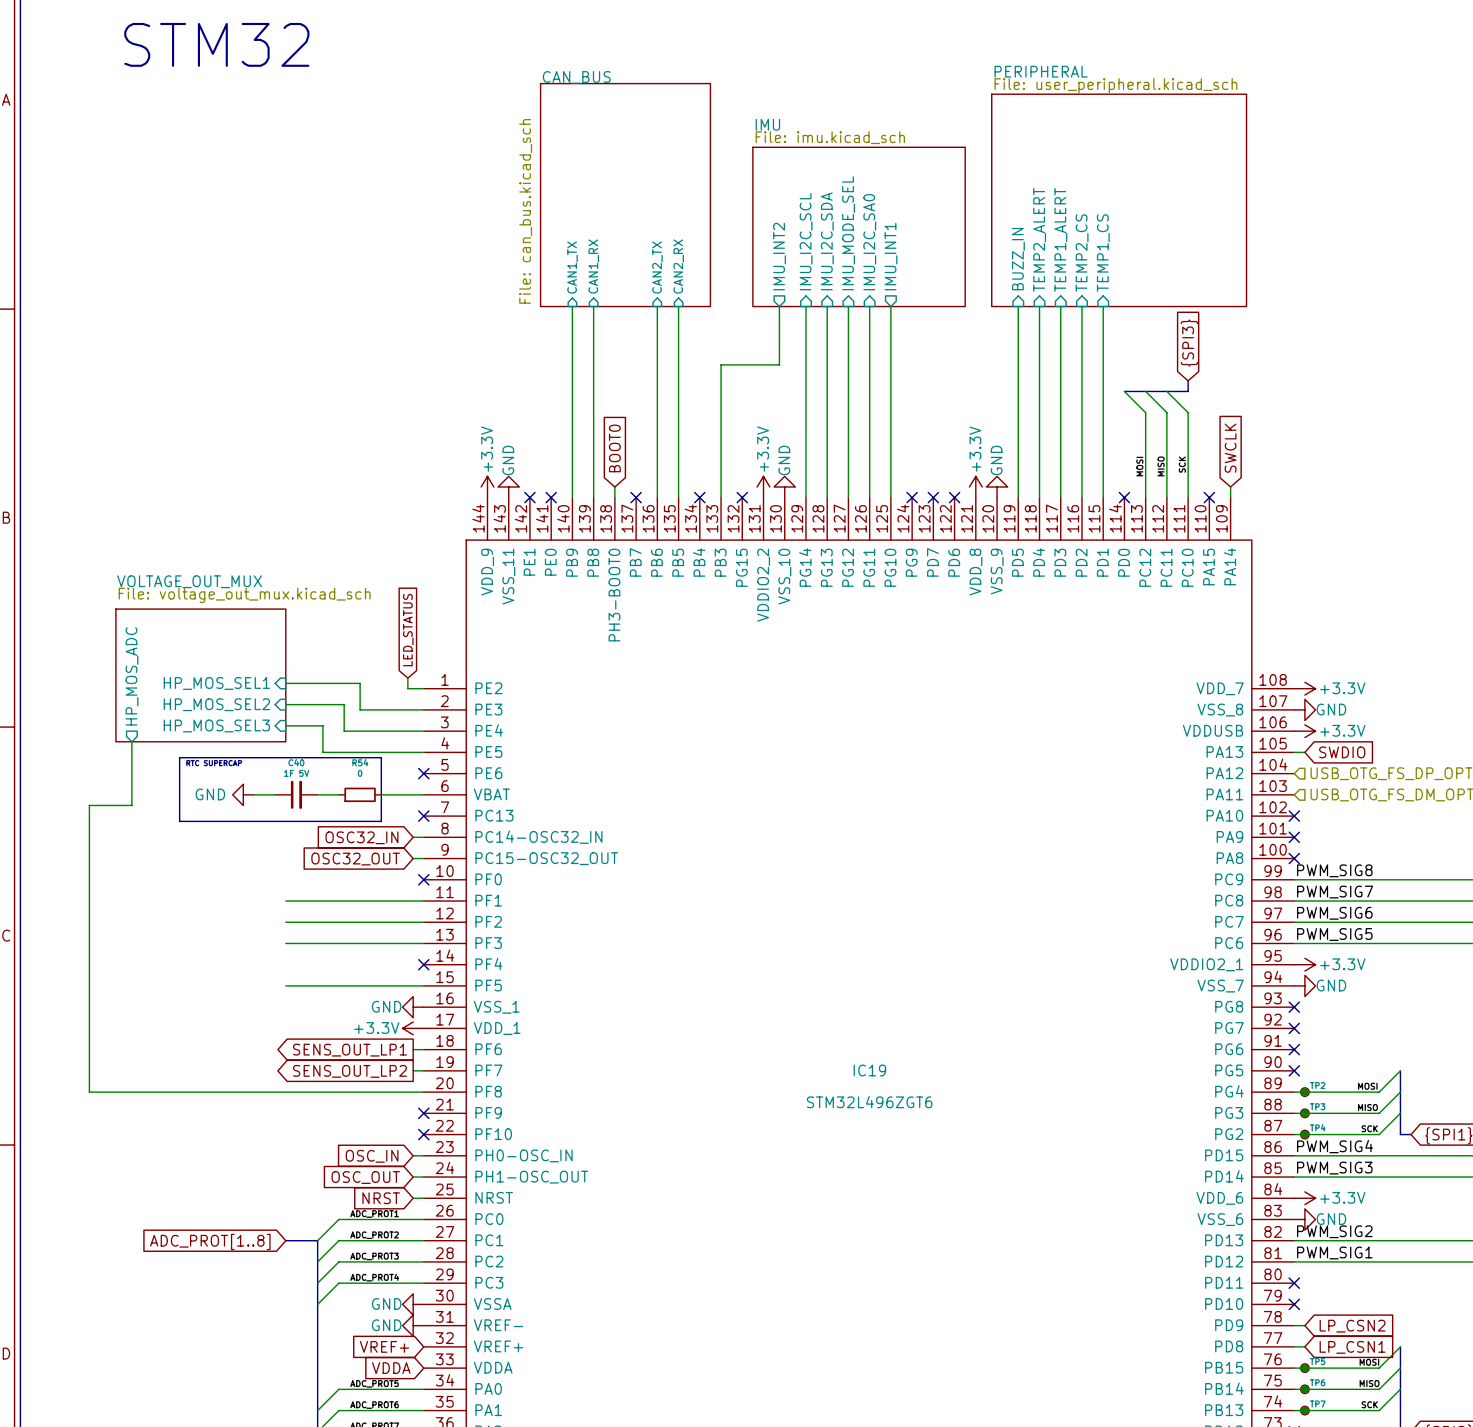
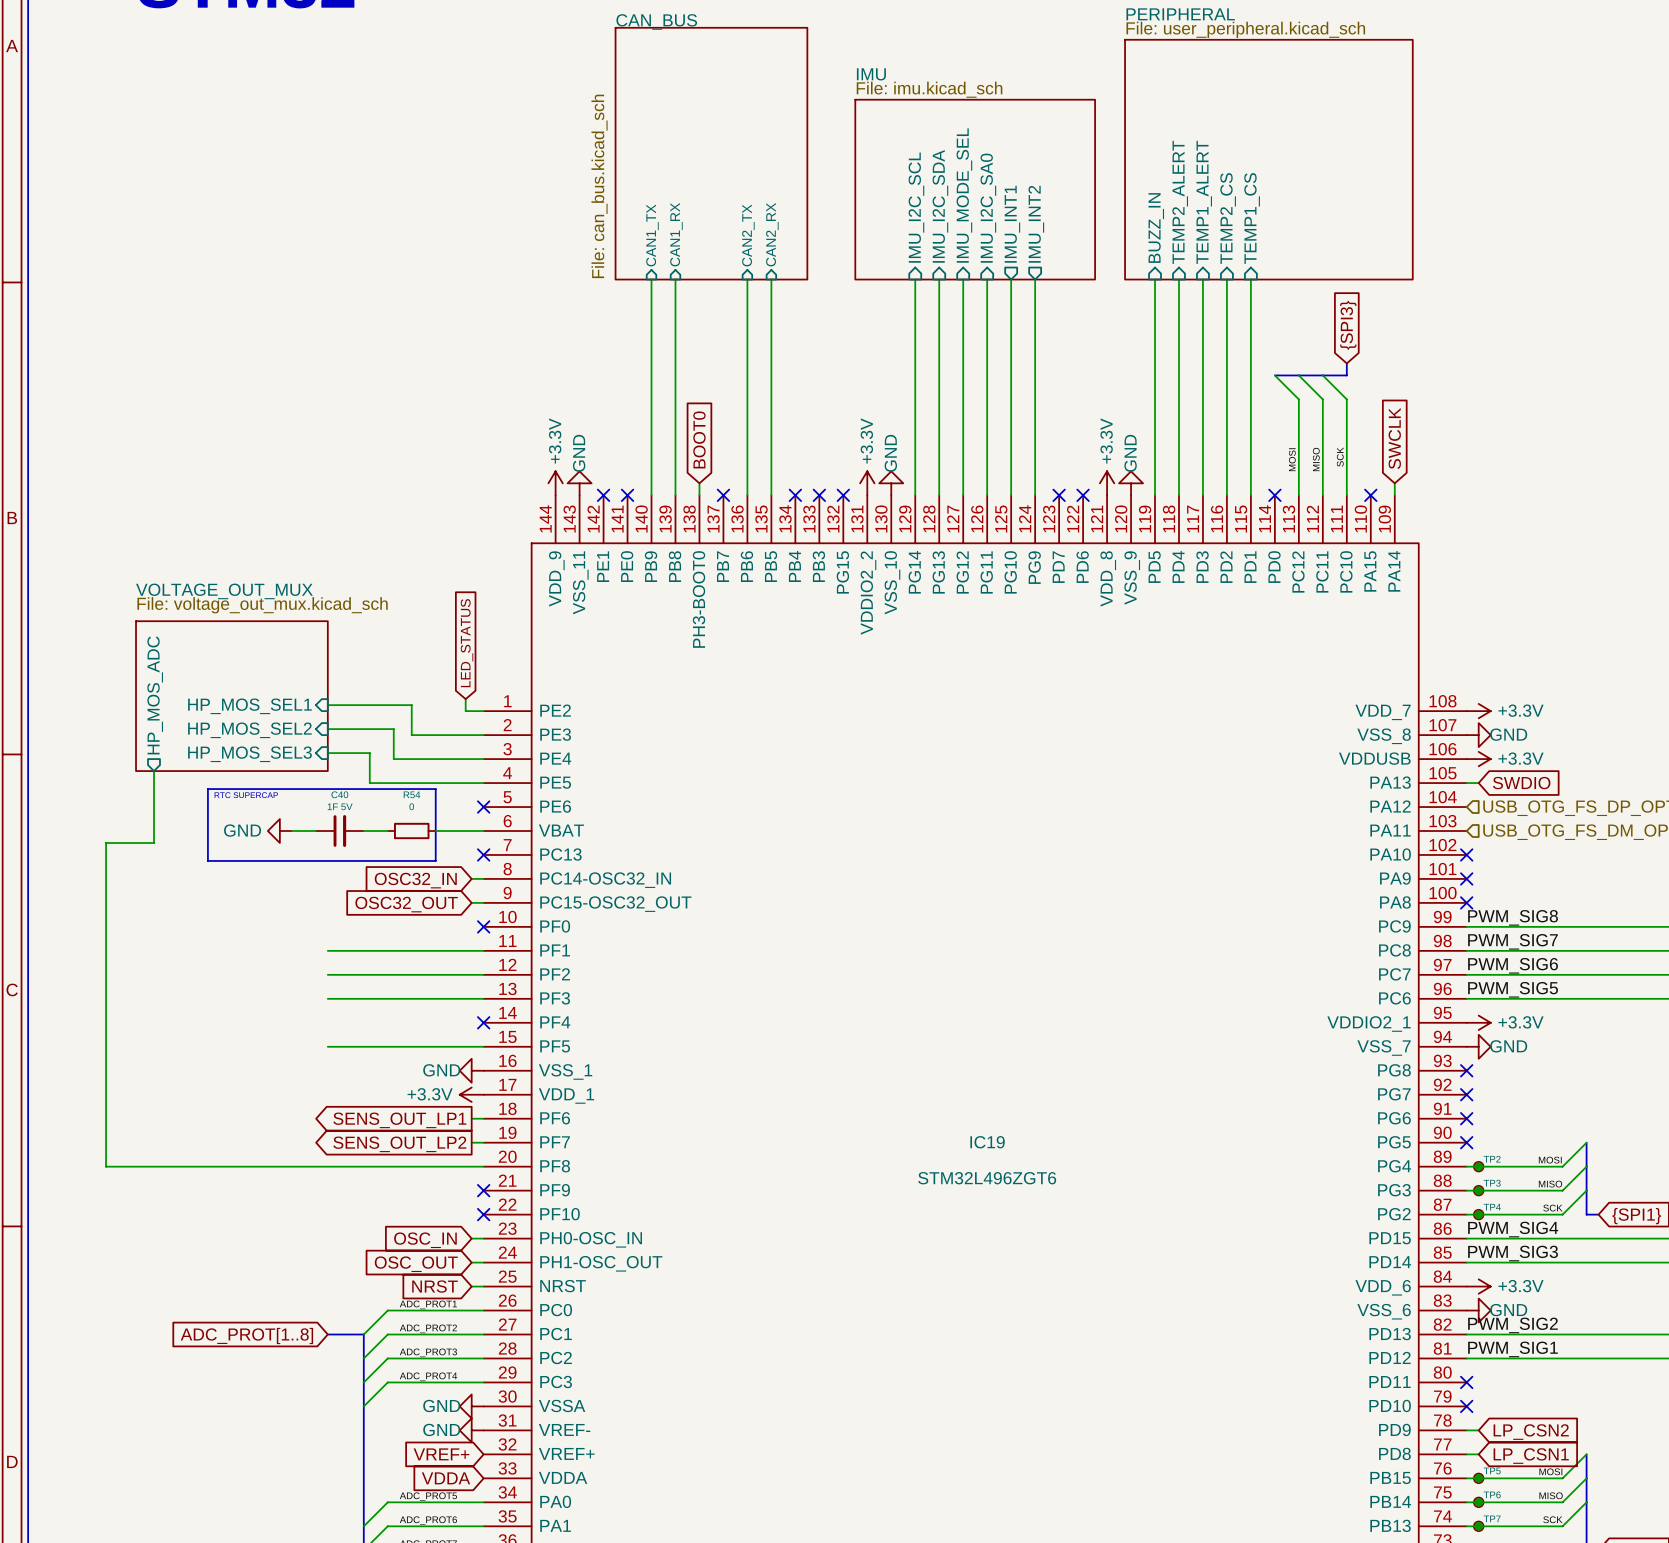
sheet pin position: IMU_INT2 (779, 256) -> IMU_INT2 (1036, 224)
wire: (779, 306) (779, 364) (721, 364) (721, 497) -> none
wire: none -> (1035, 279) (1035, 495)
no-connect mark: none -> (819, 495)
no-connect mark: (912, 497) -> none

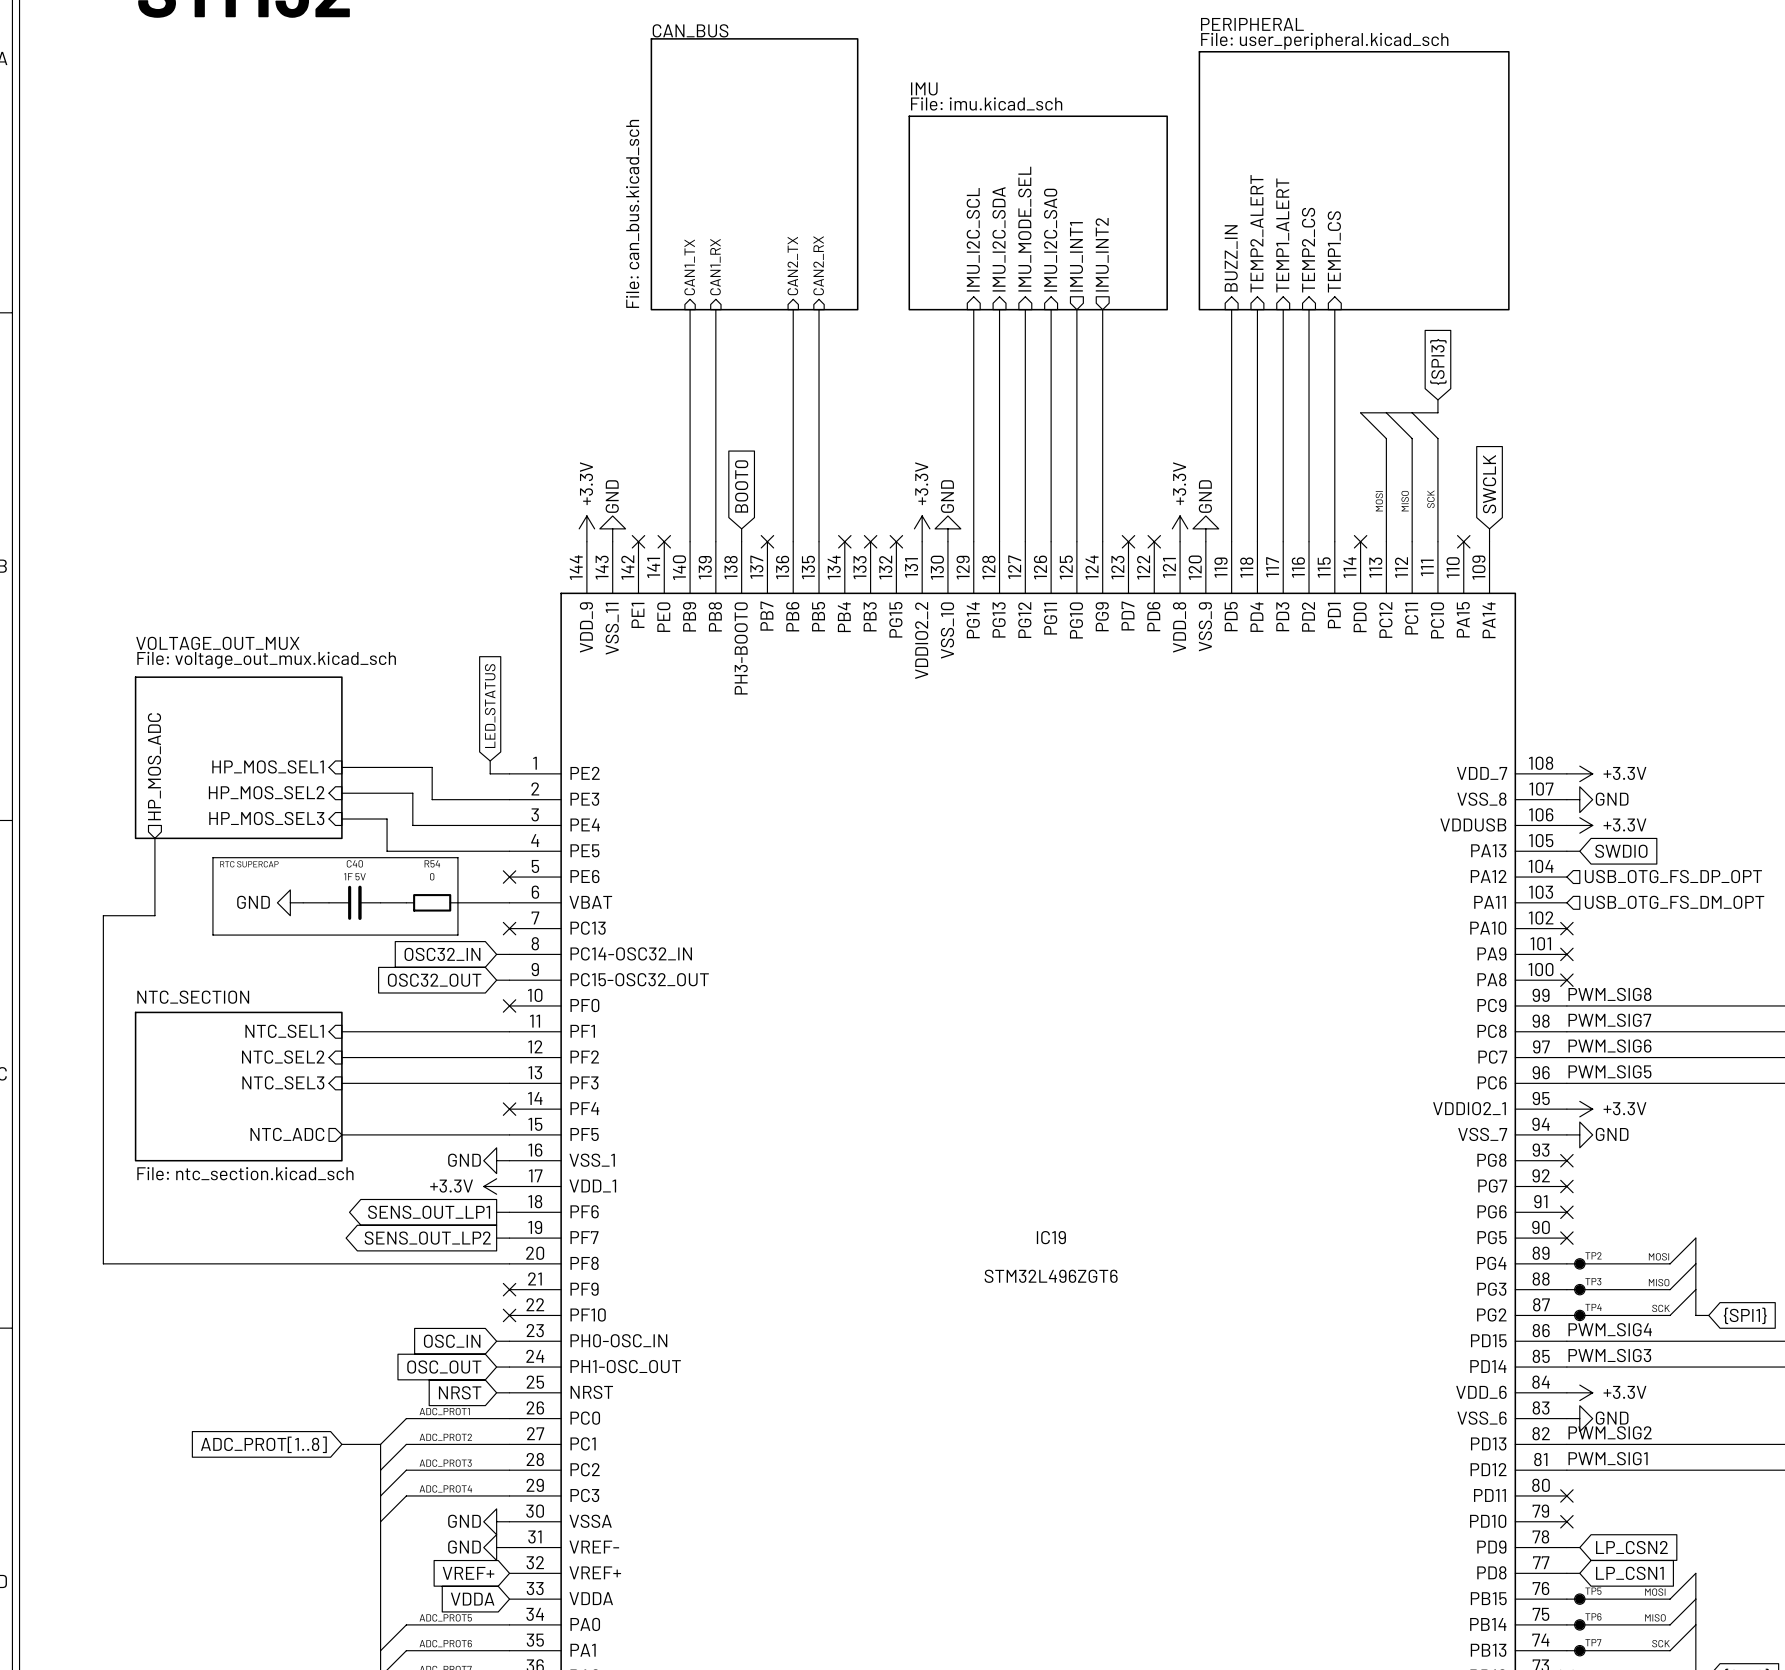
sheet pin: none -> NTC_SEL1 (284, 1031)
sheet pin: none -> NTC_SEL2 (283, 1057)
sheet pin: none -> NTC_SEL3 (283, 1082)
sheet NTC_SECTION: none -> File: ntc_section.kicad_sch (238, 1086)
sheet pin: none -> NTC_ADC (287, 1134)

